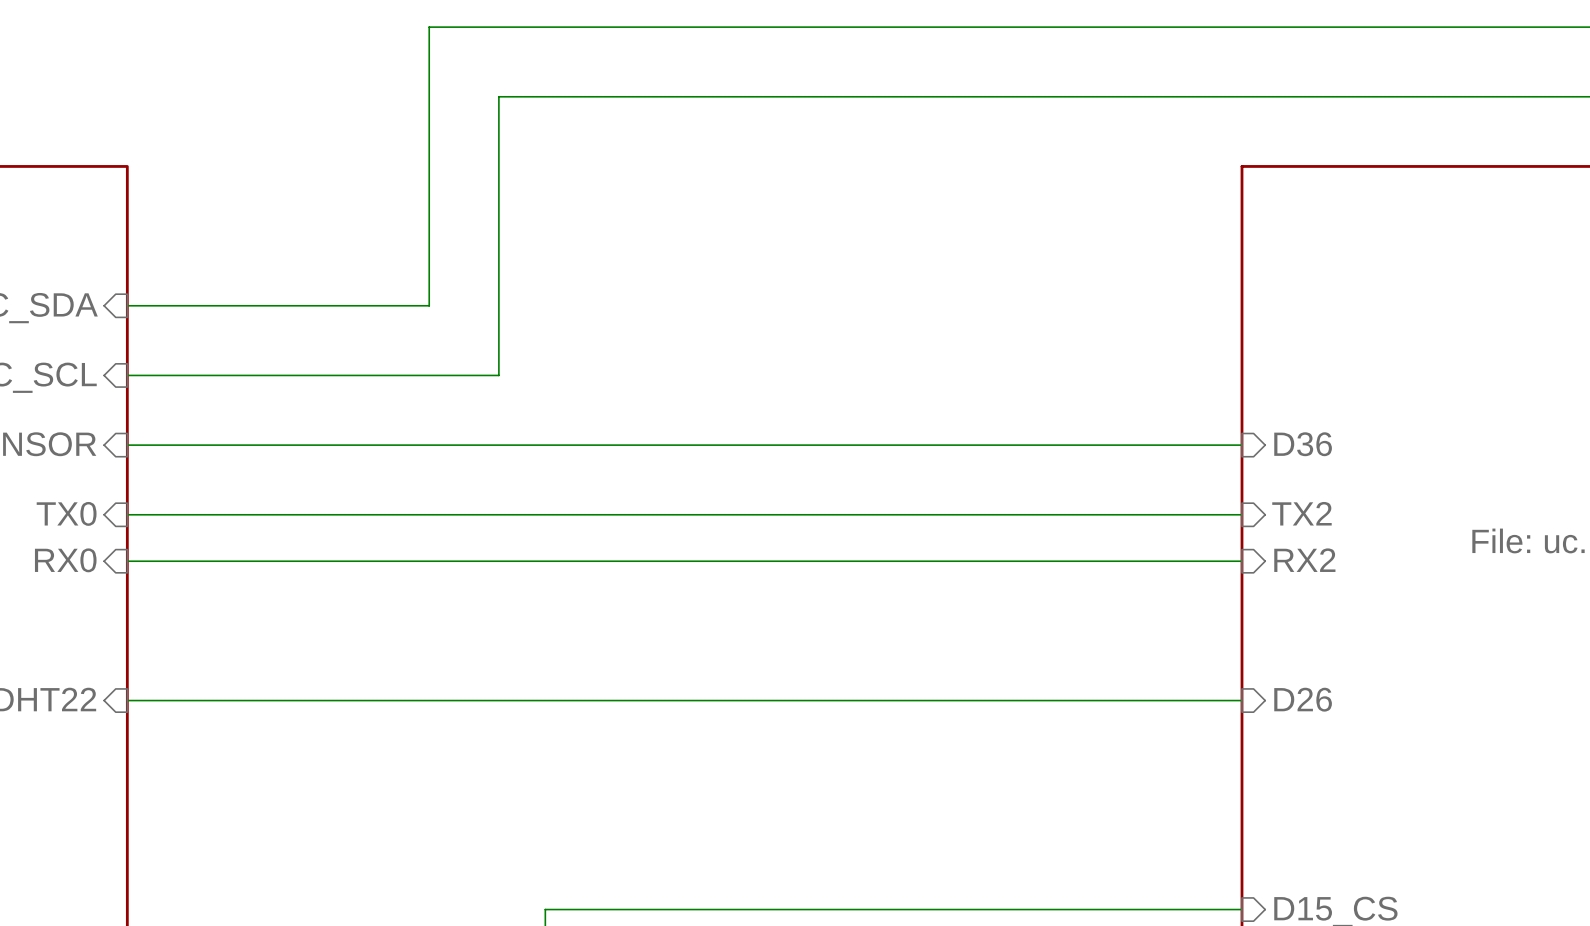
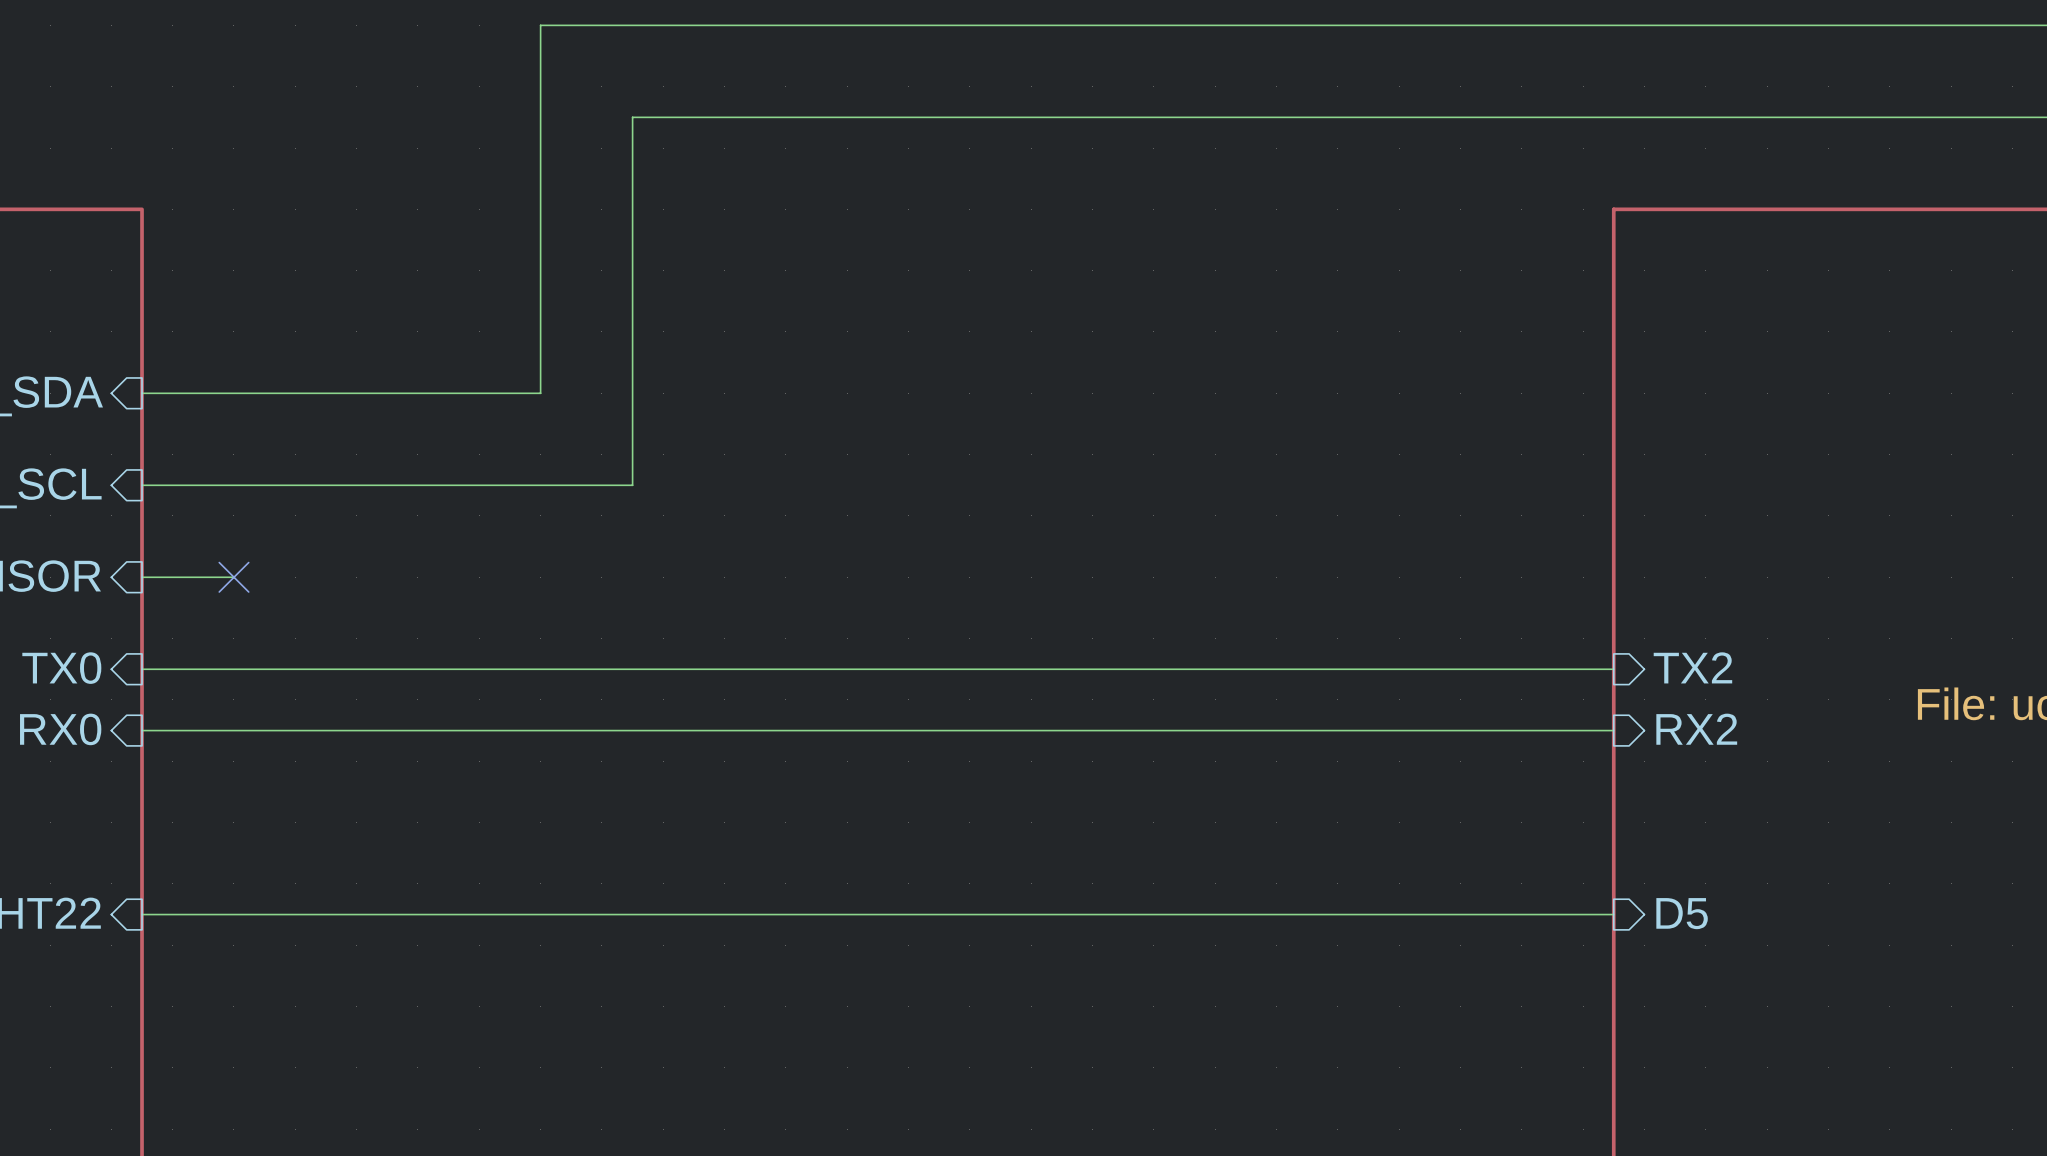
sheet pin: D36 (1303, 444) -> none
wire: (197, 445) (1241, 445) -> none
no-connect mark: none -> (233, 577)
sheet pin: D26 (1303, 699) -> D5 (1682, 913)

